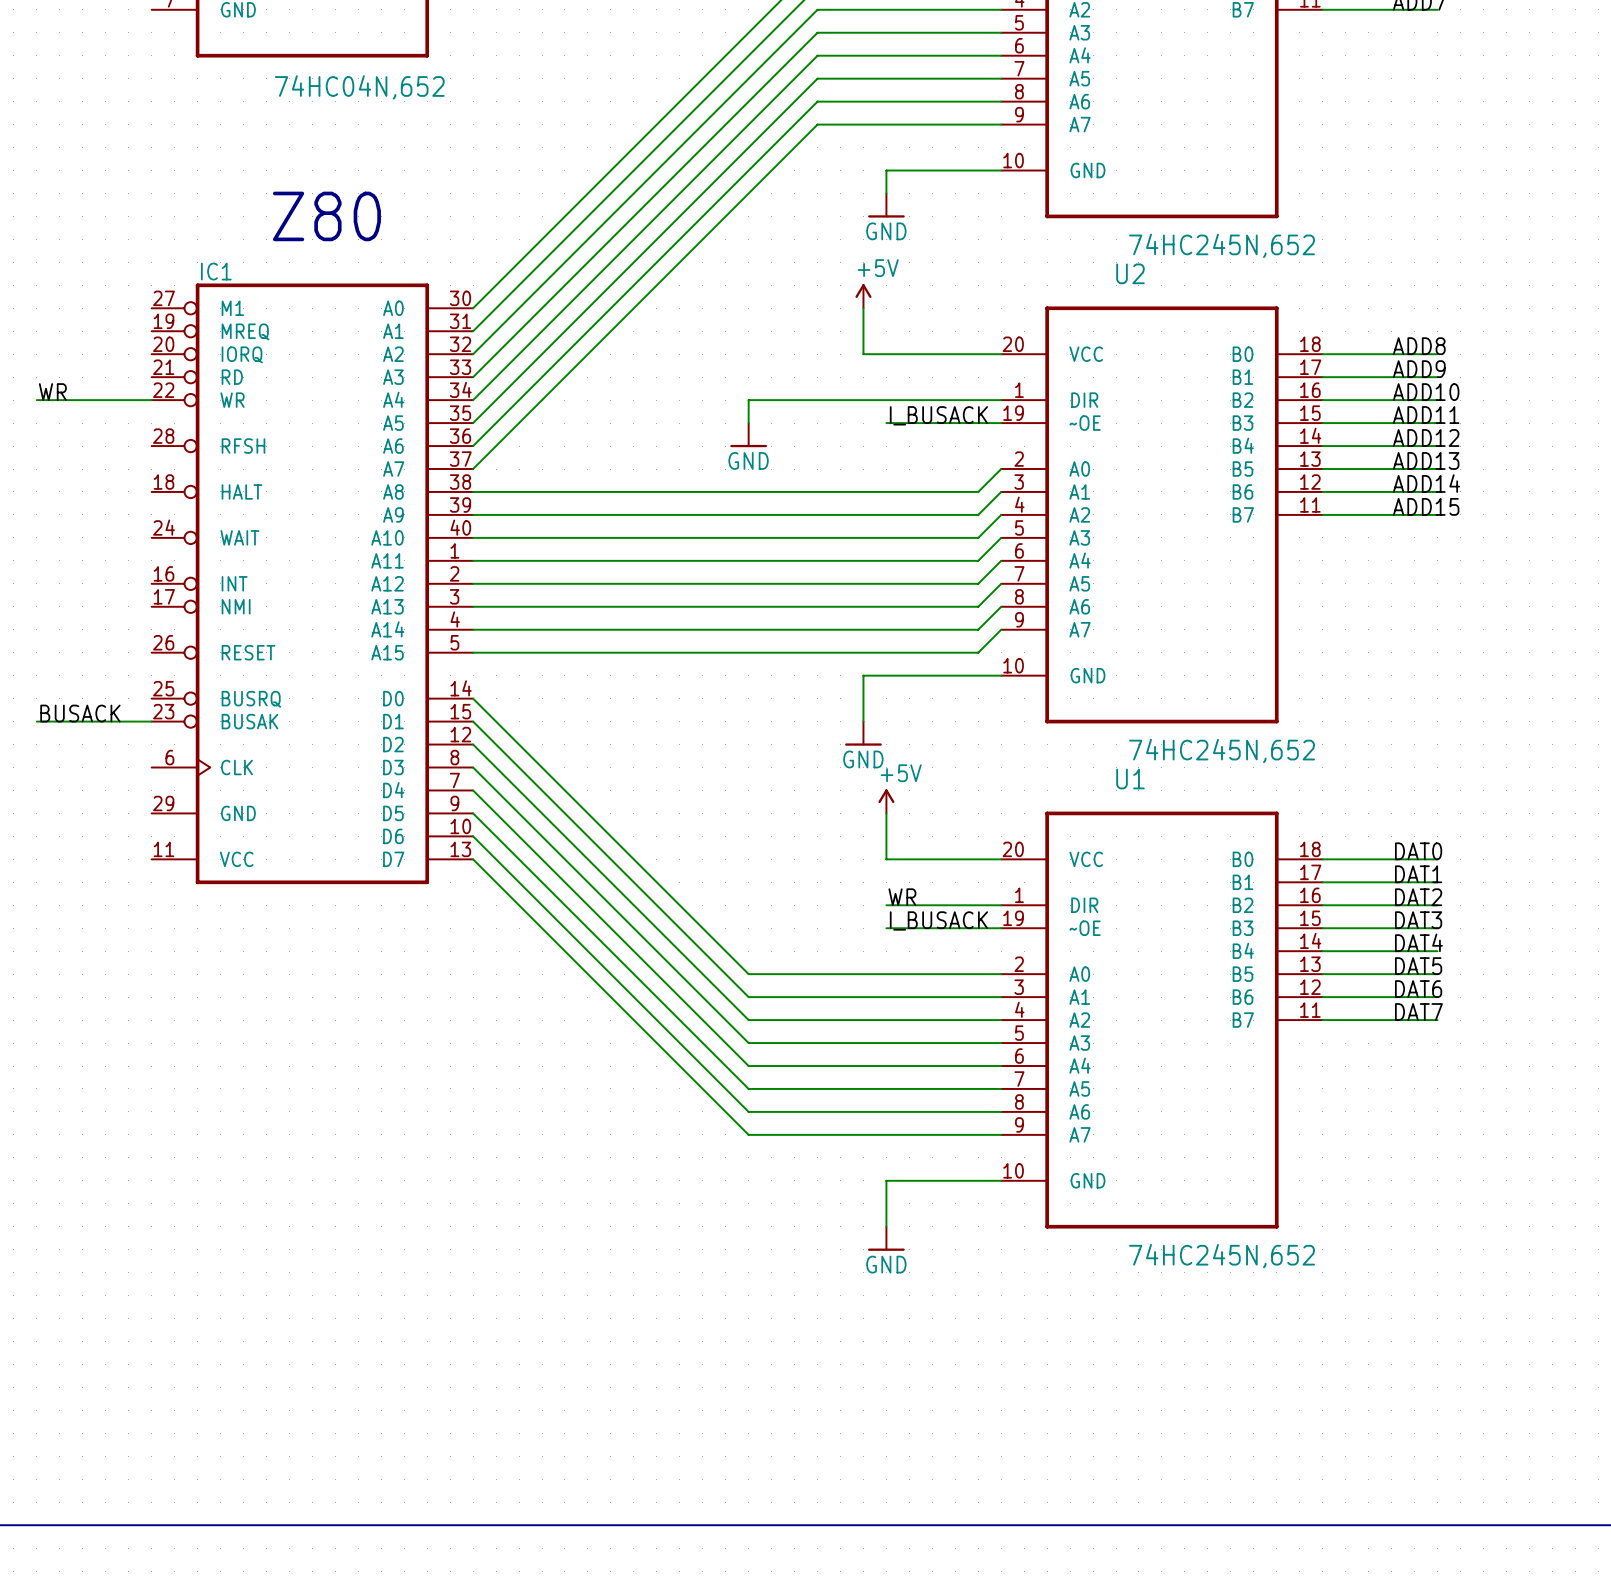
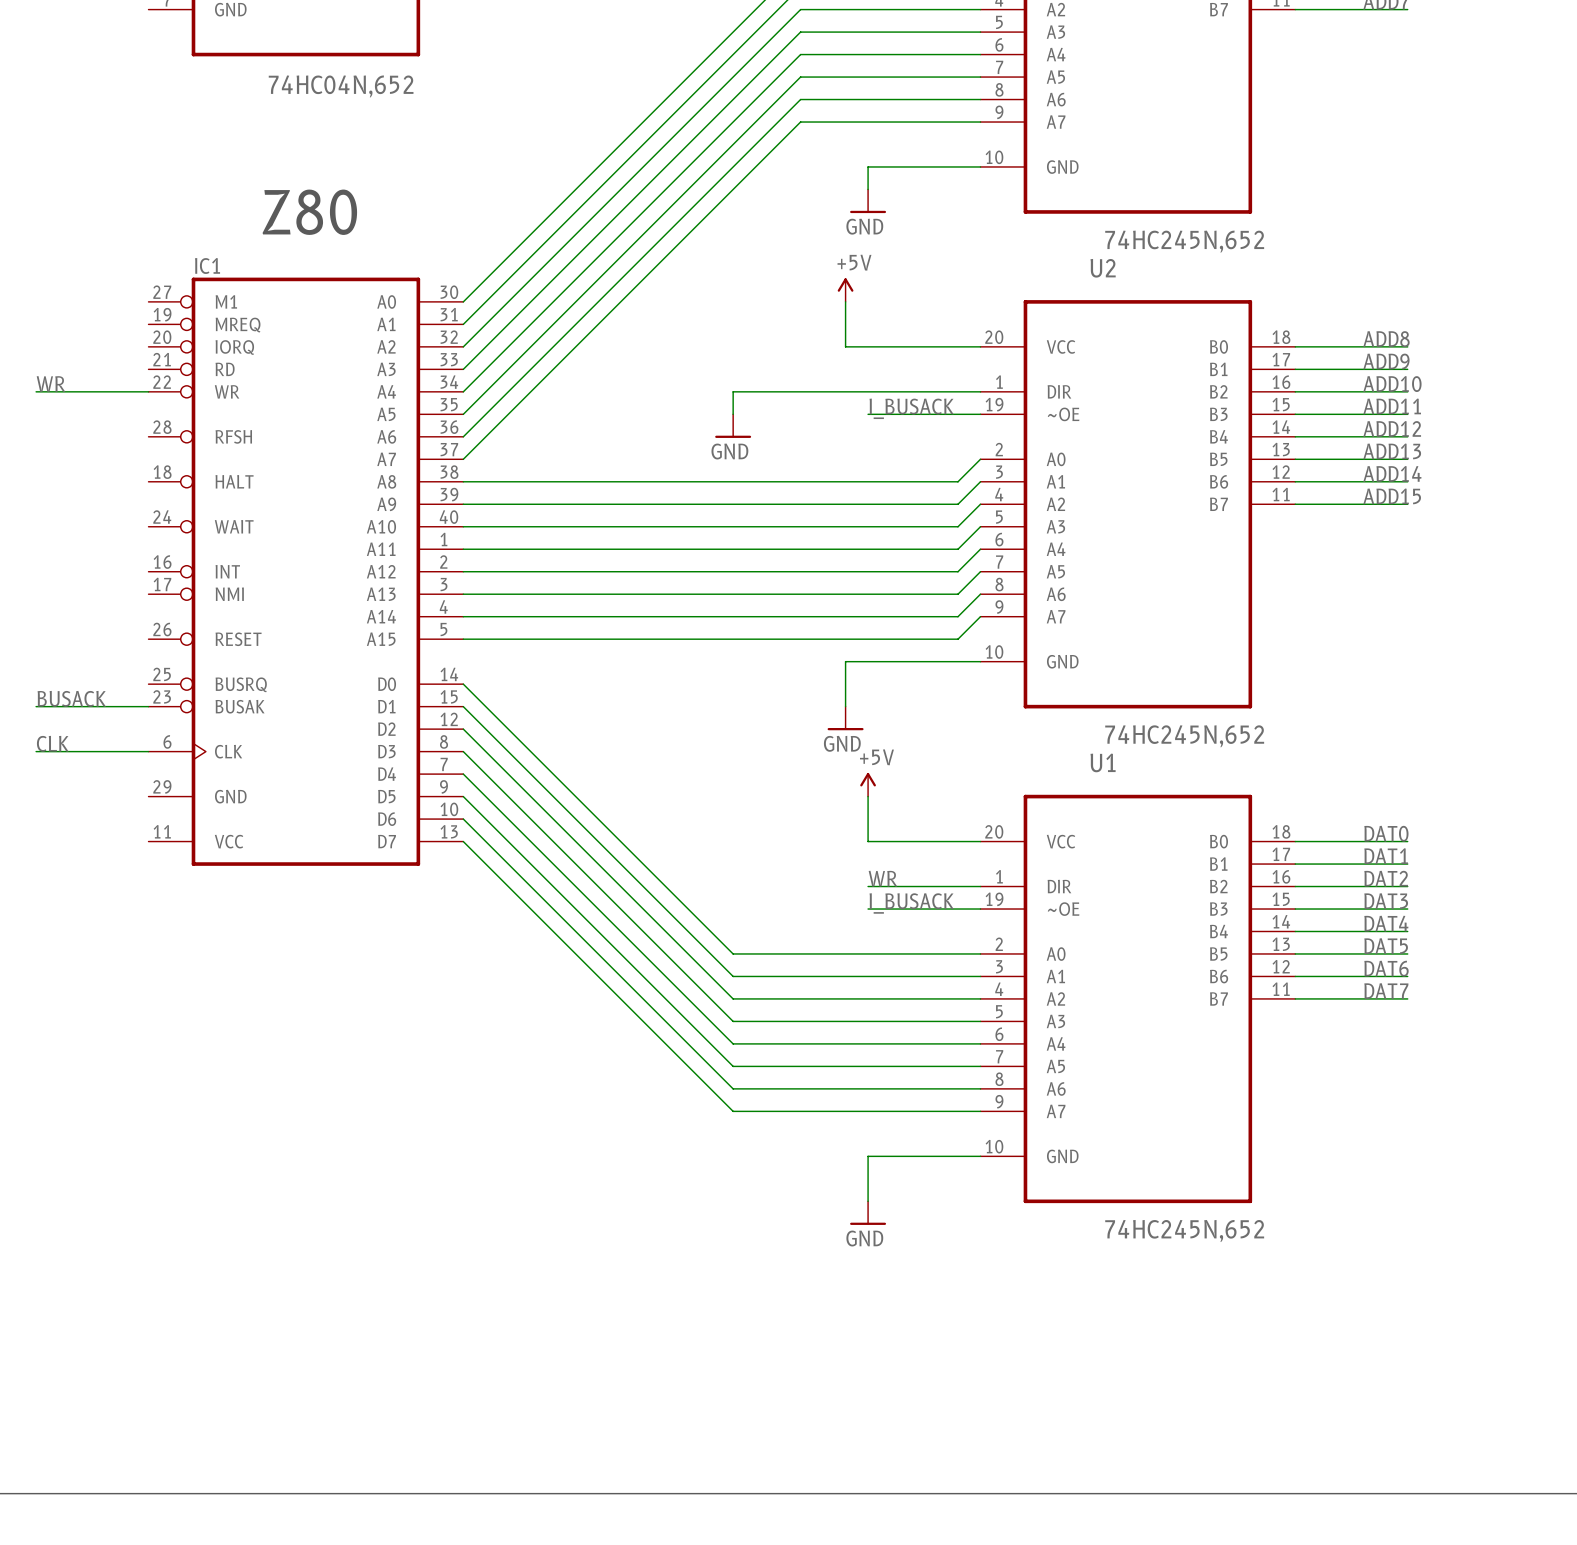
label: none -> CLK (52, 743)
wire: none -> (36, 751) (148, 751)

